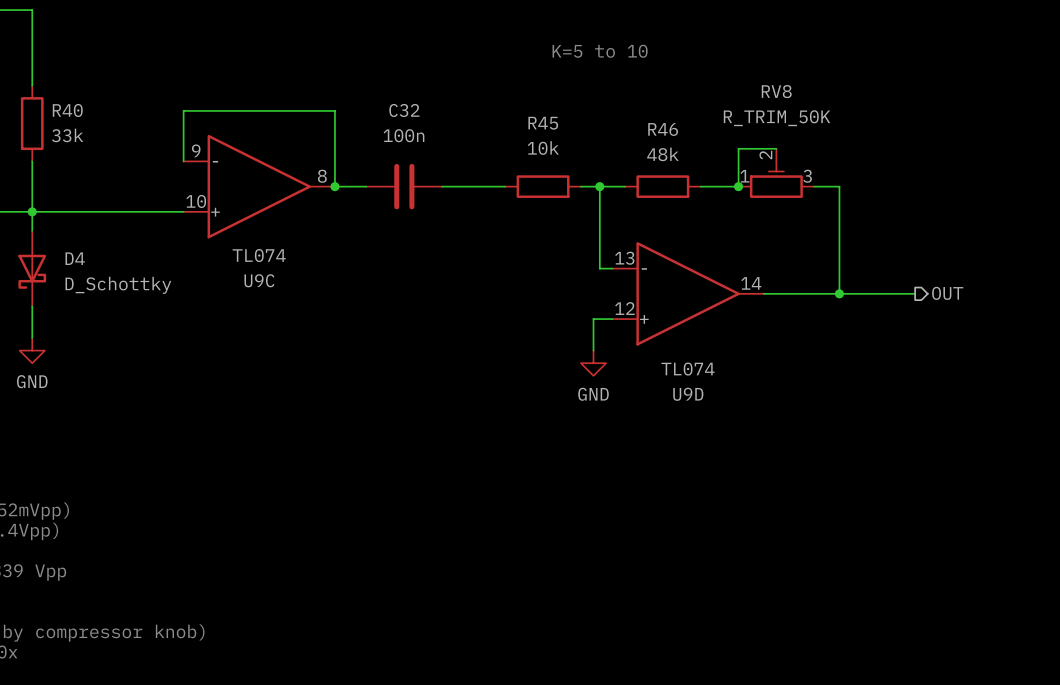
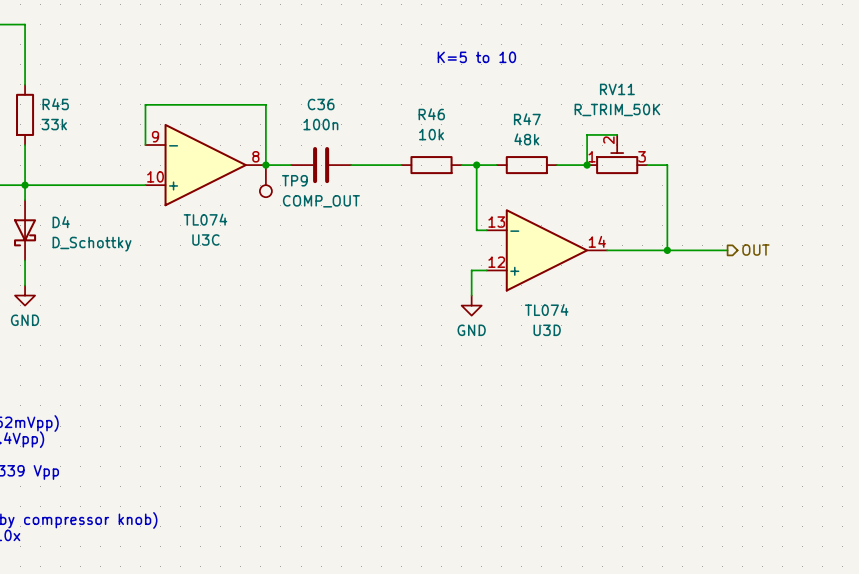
RV8 name: RV8 (776, 91) -> RV11 (617, 89)
R40 name: R40 (67, 110) -> R45 (55, 104)
C32 name: C32 (404, 110) -> C36 (321, 104)
R45 name: R45 (543, 123) -> R46 (431, 114)
R46 name: R46 (663, 129) -> R47 (527, 119)
TP9: none -> COMP_OUT (265, 181)
U9C name: U9C (259, 280) -> U3C (205, 239)
U9D name: U9D (688, 394) -> U3D (547, 330)

